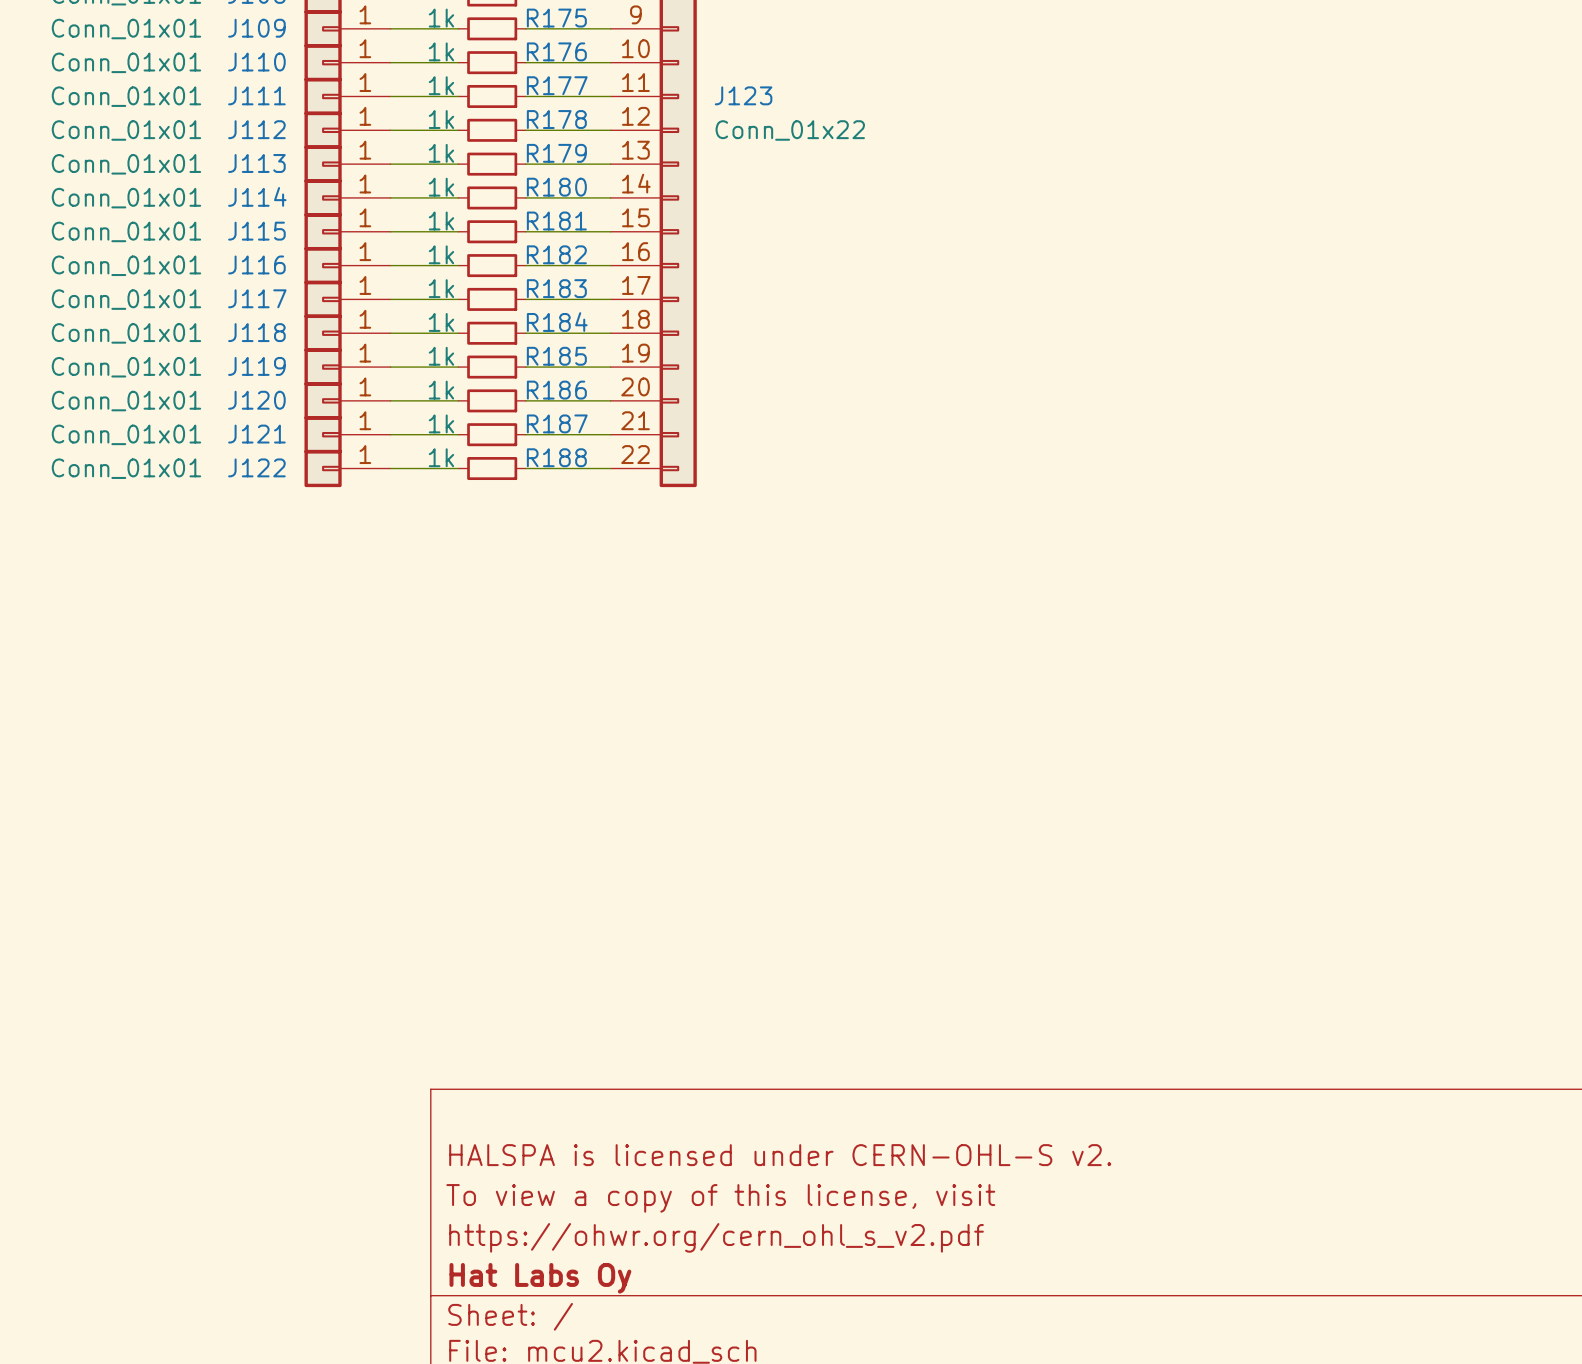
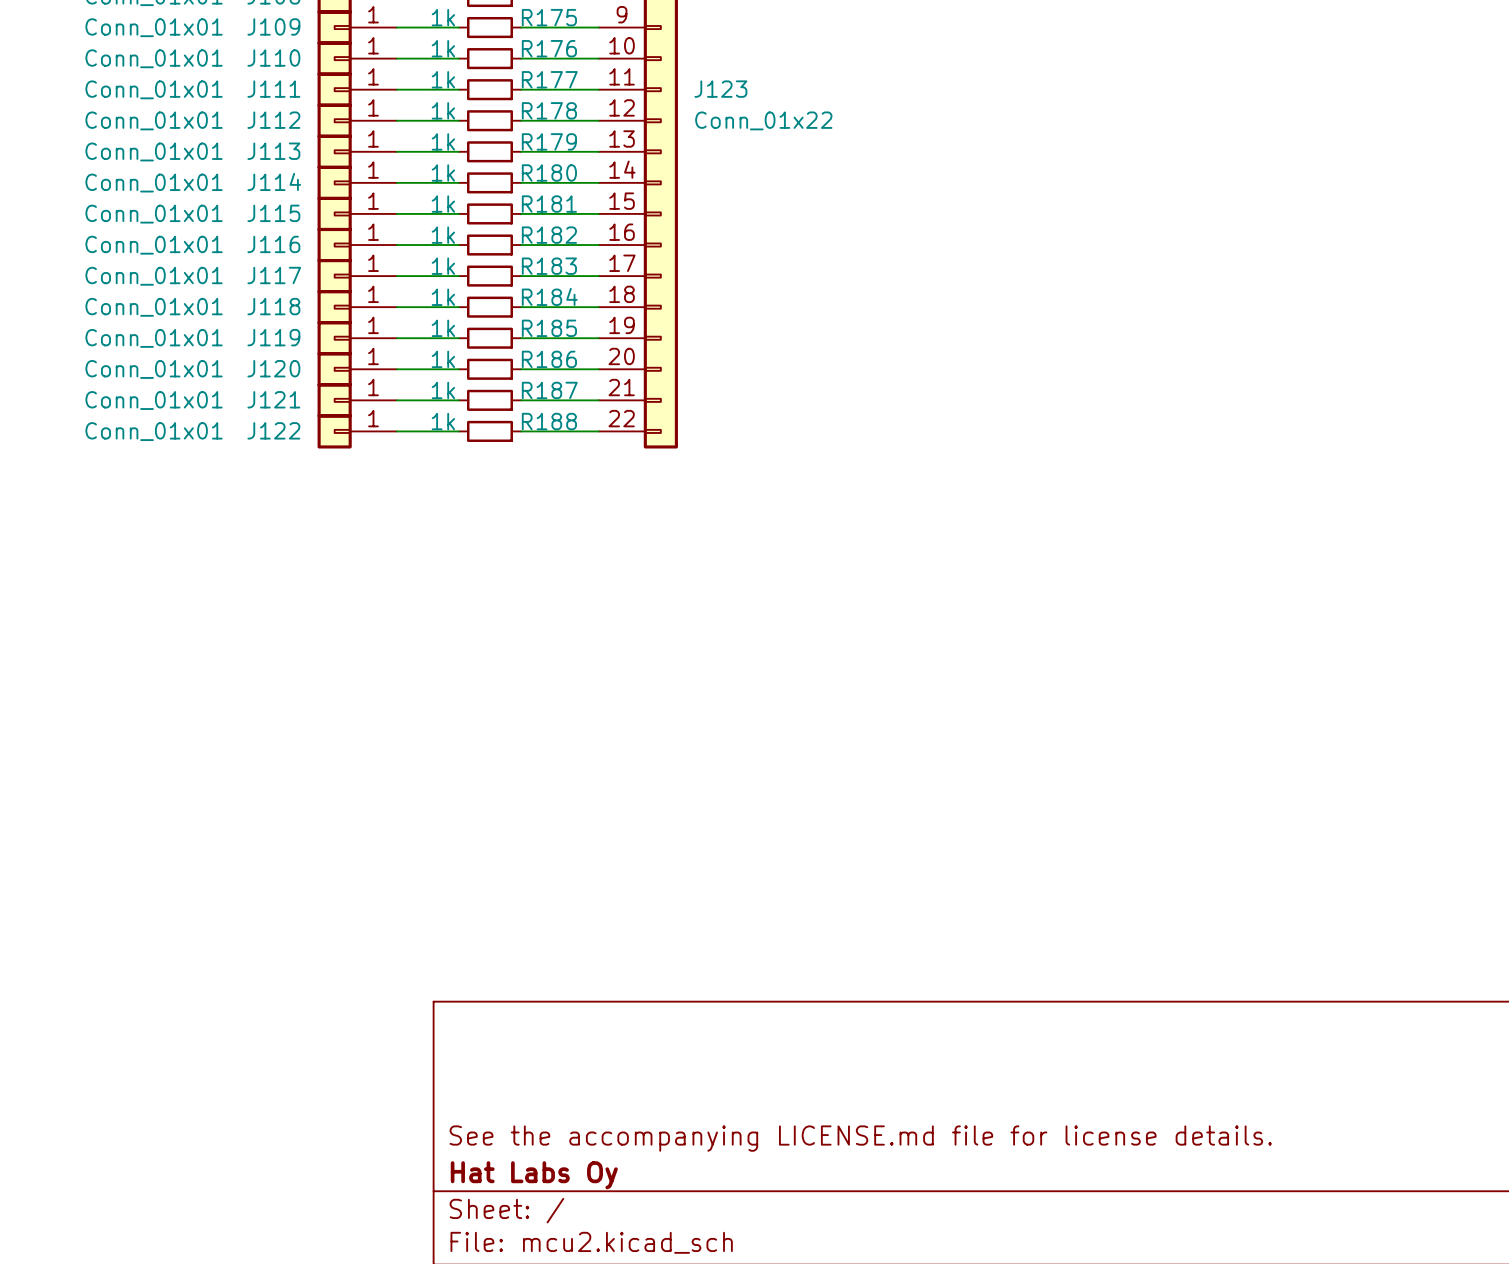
title block: HALSPA is licensed under CERN-OHL-S v2. (780, 1155) -> none
title block: To view a copy of this license, visit (720, 1198) -> none
title block: https://ohwr.org/cern_ohl_s_v2.pdf (716, 1237) -> See the accompanying LICENSE.md file for license details. (860, 1138)

